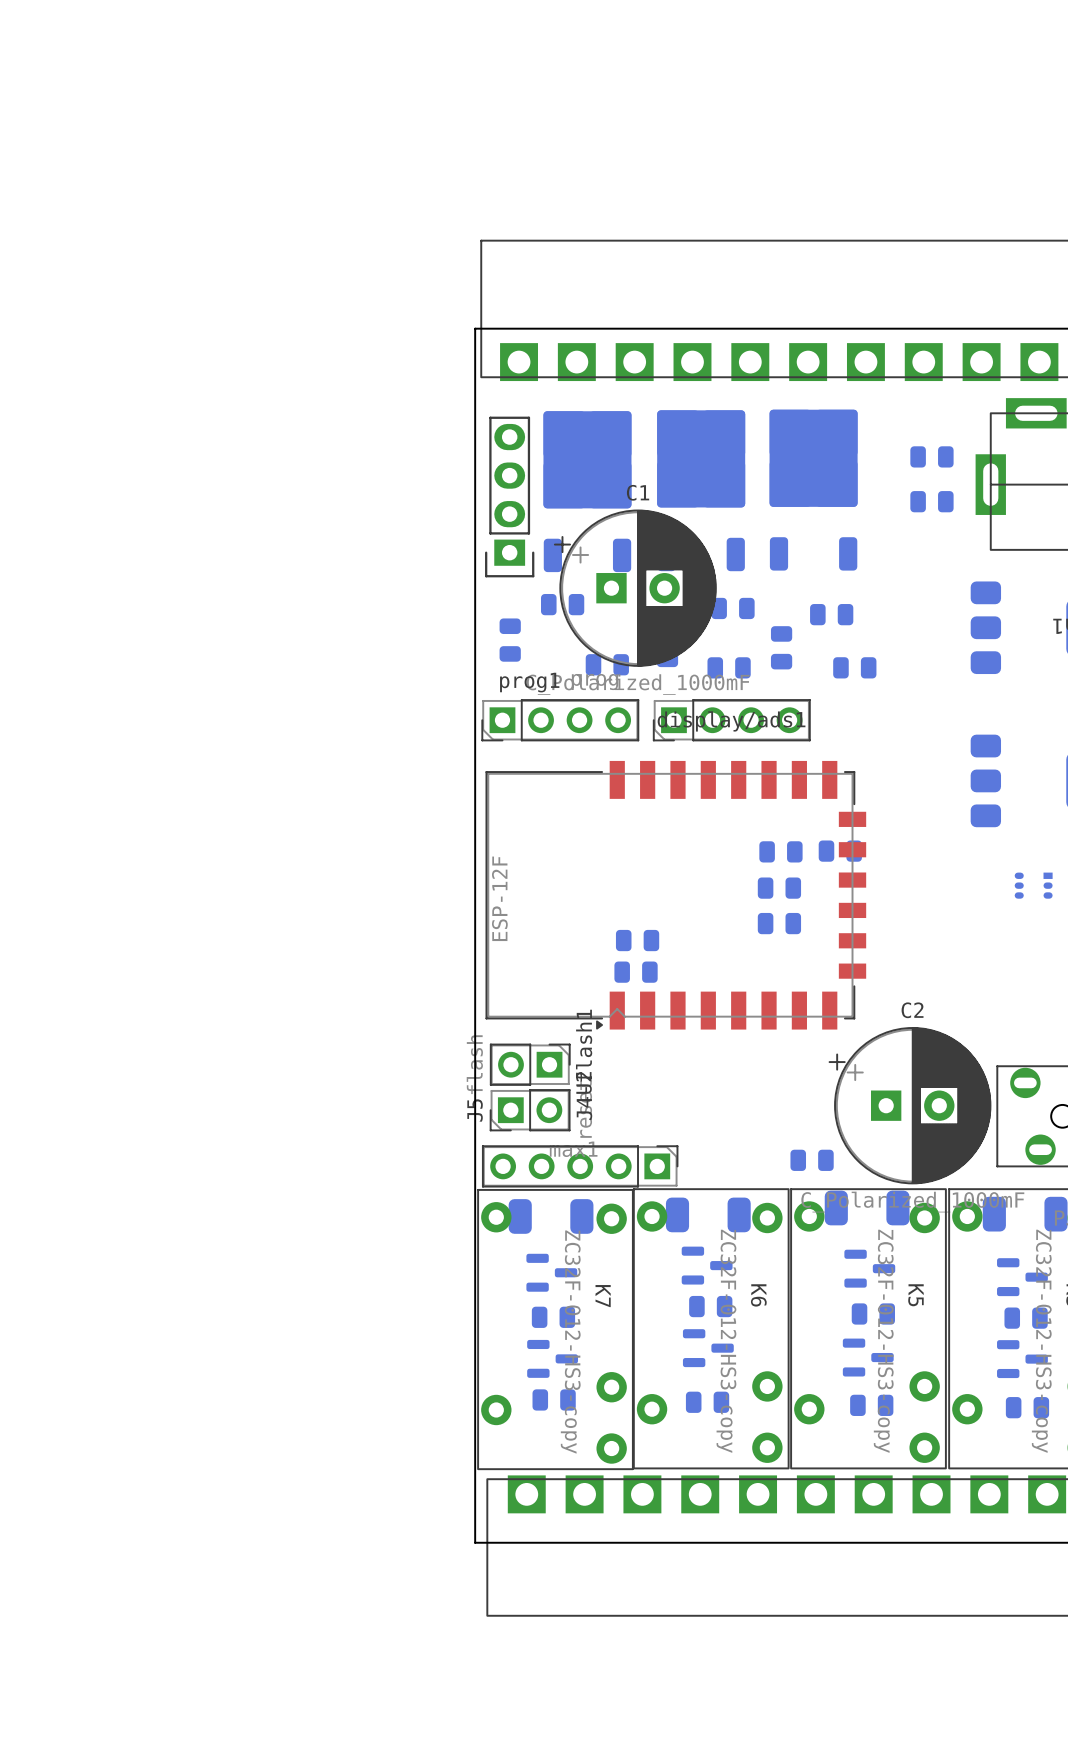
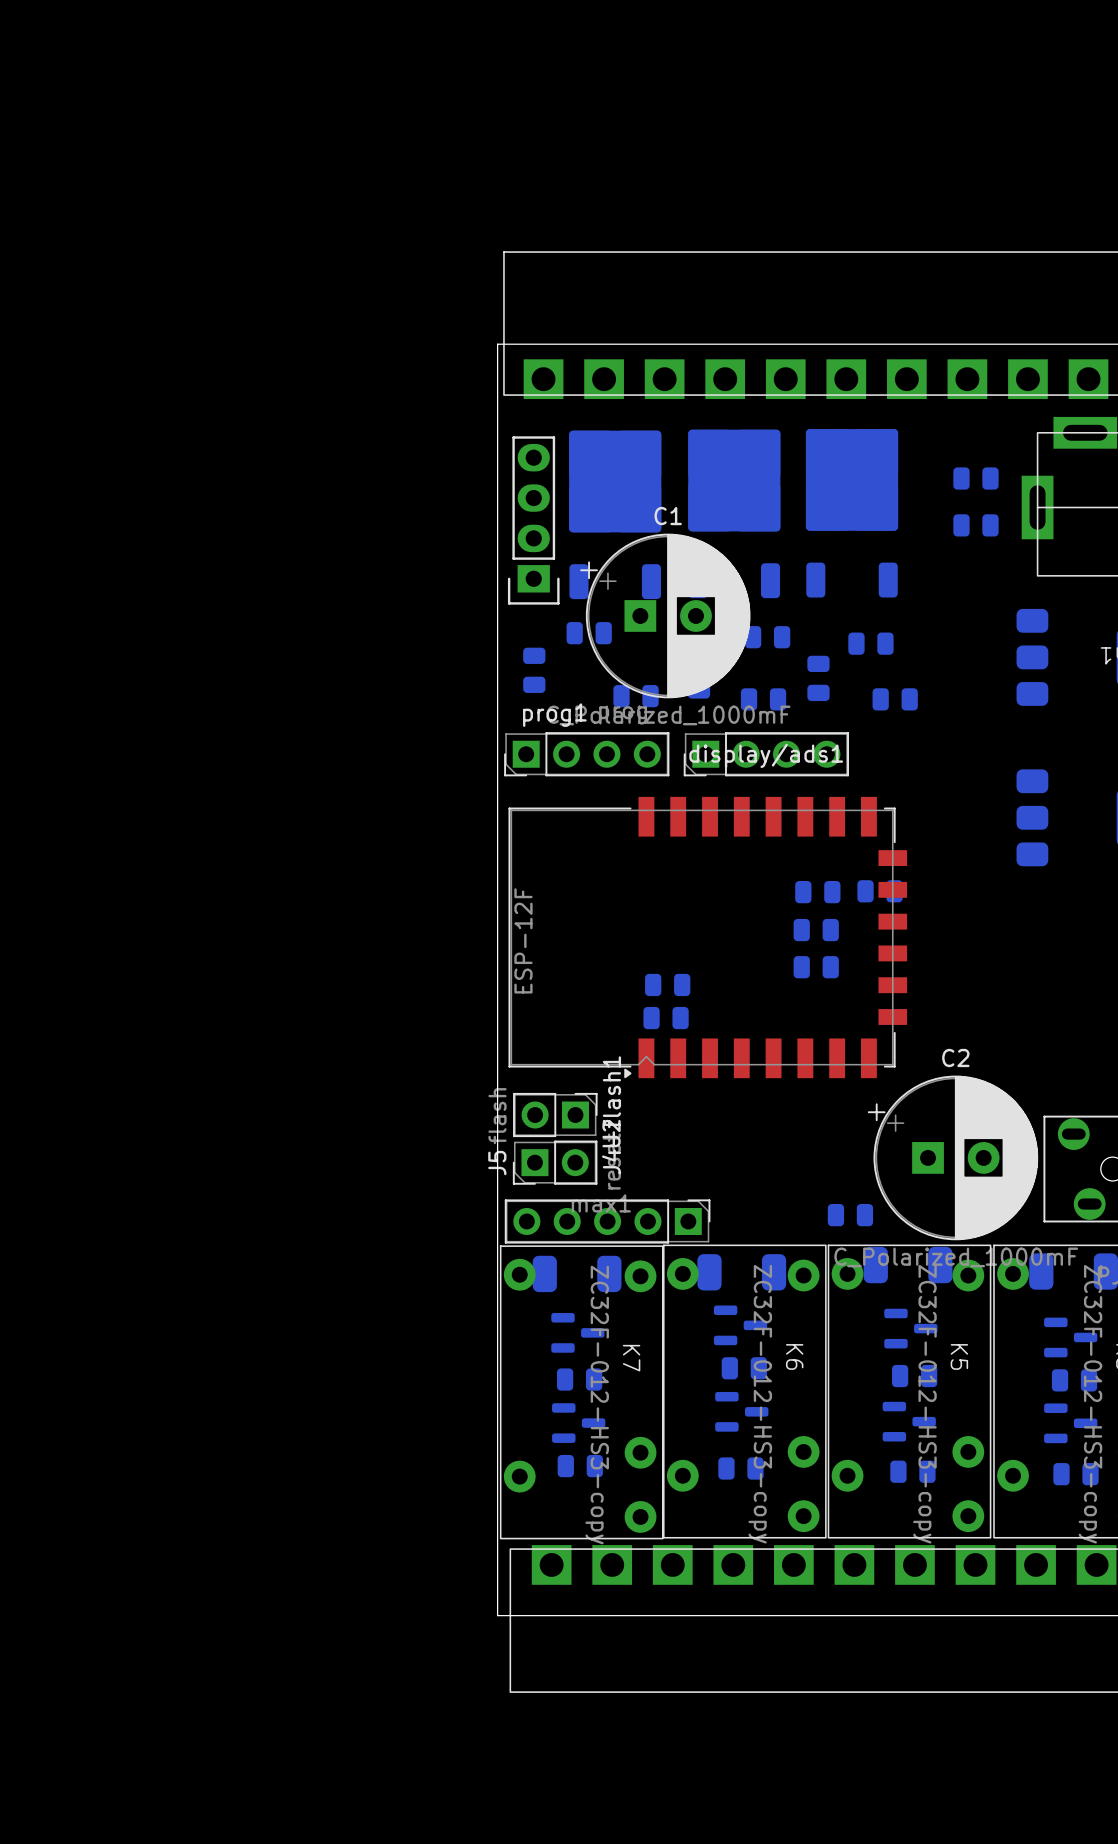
part: (1033, 885) -> none

